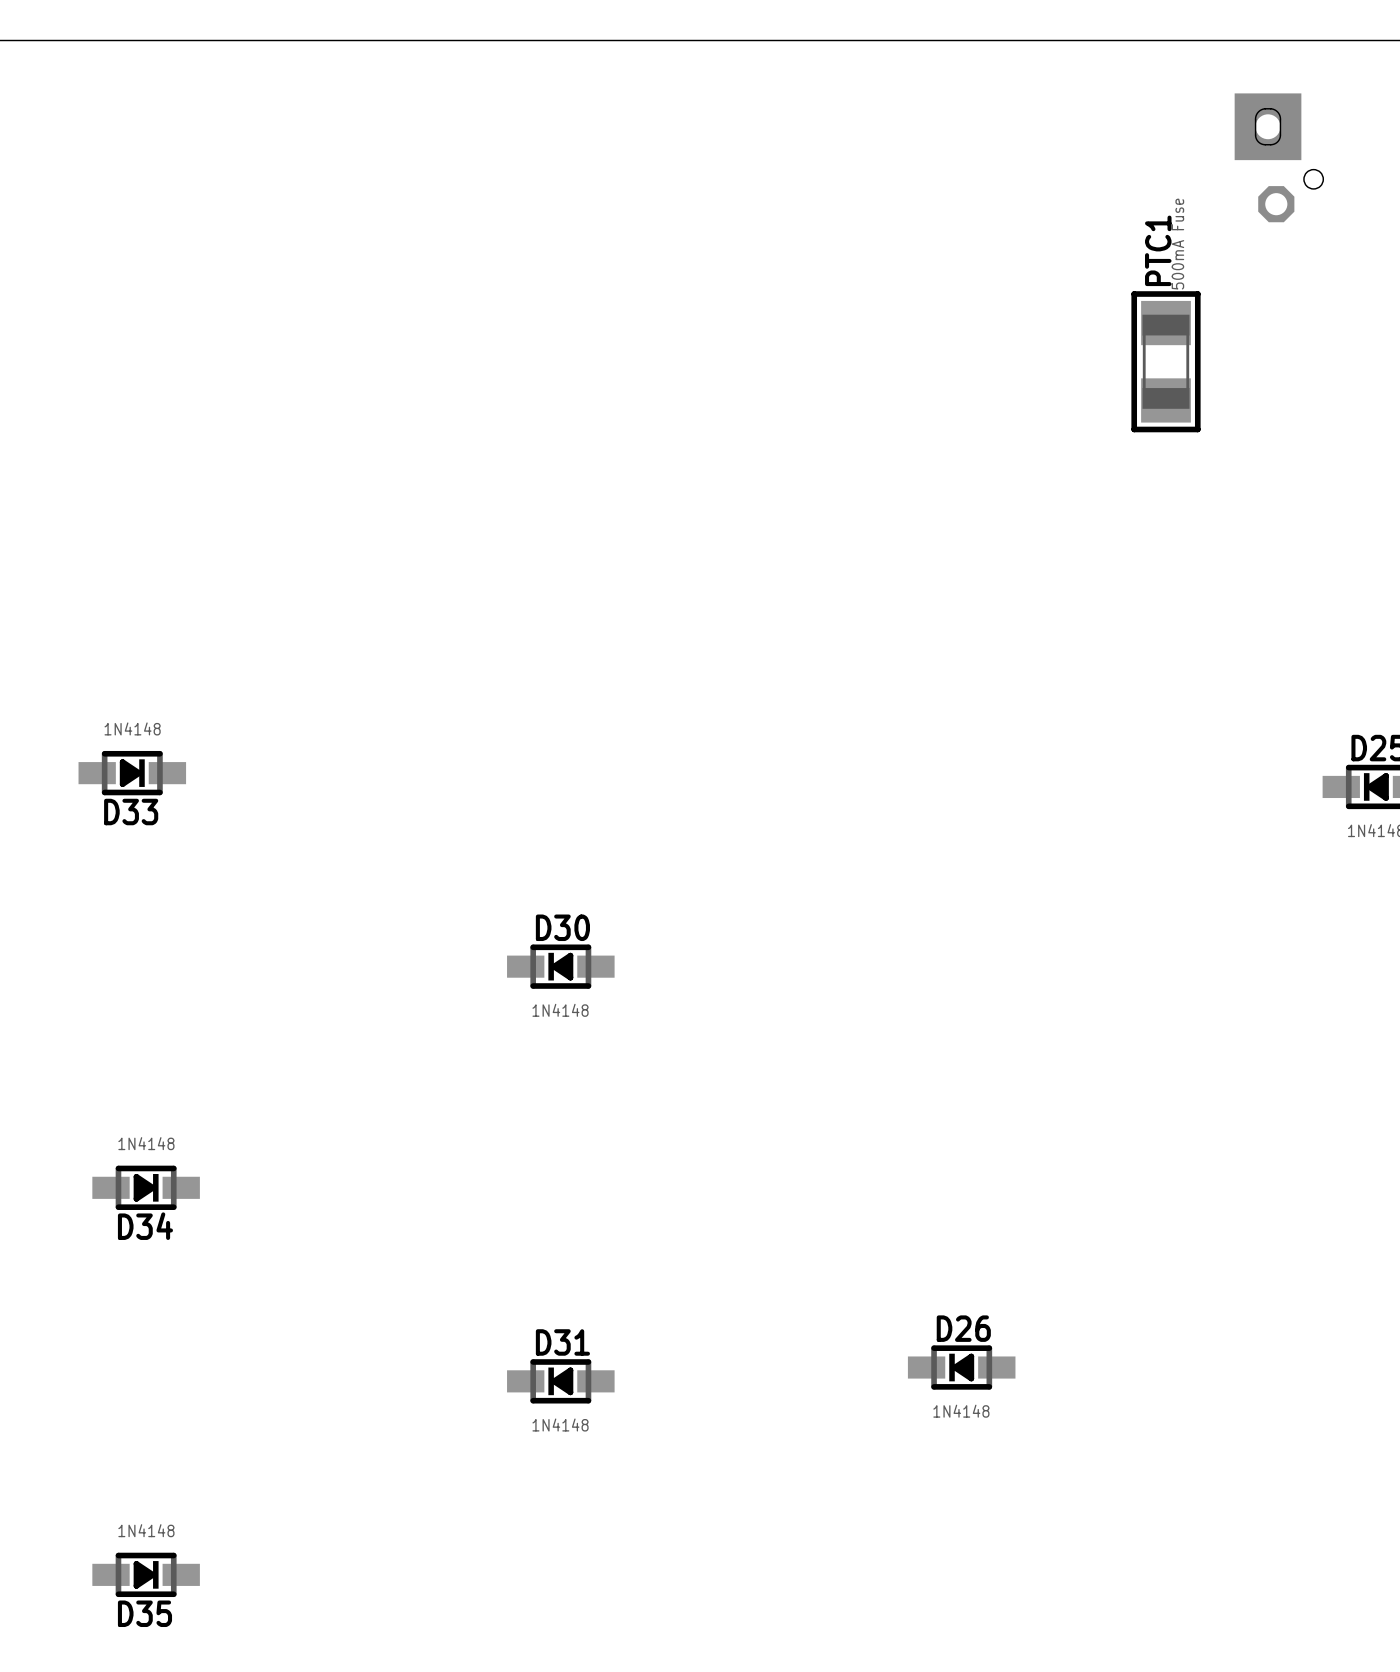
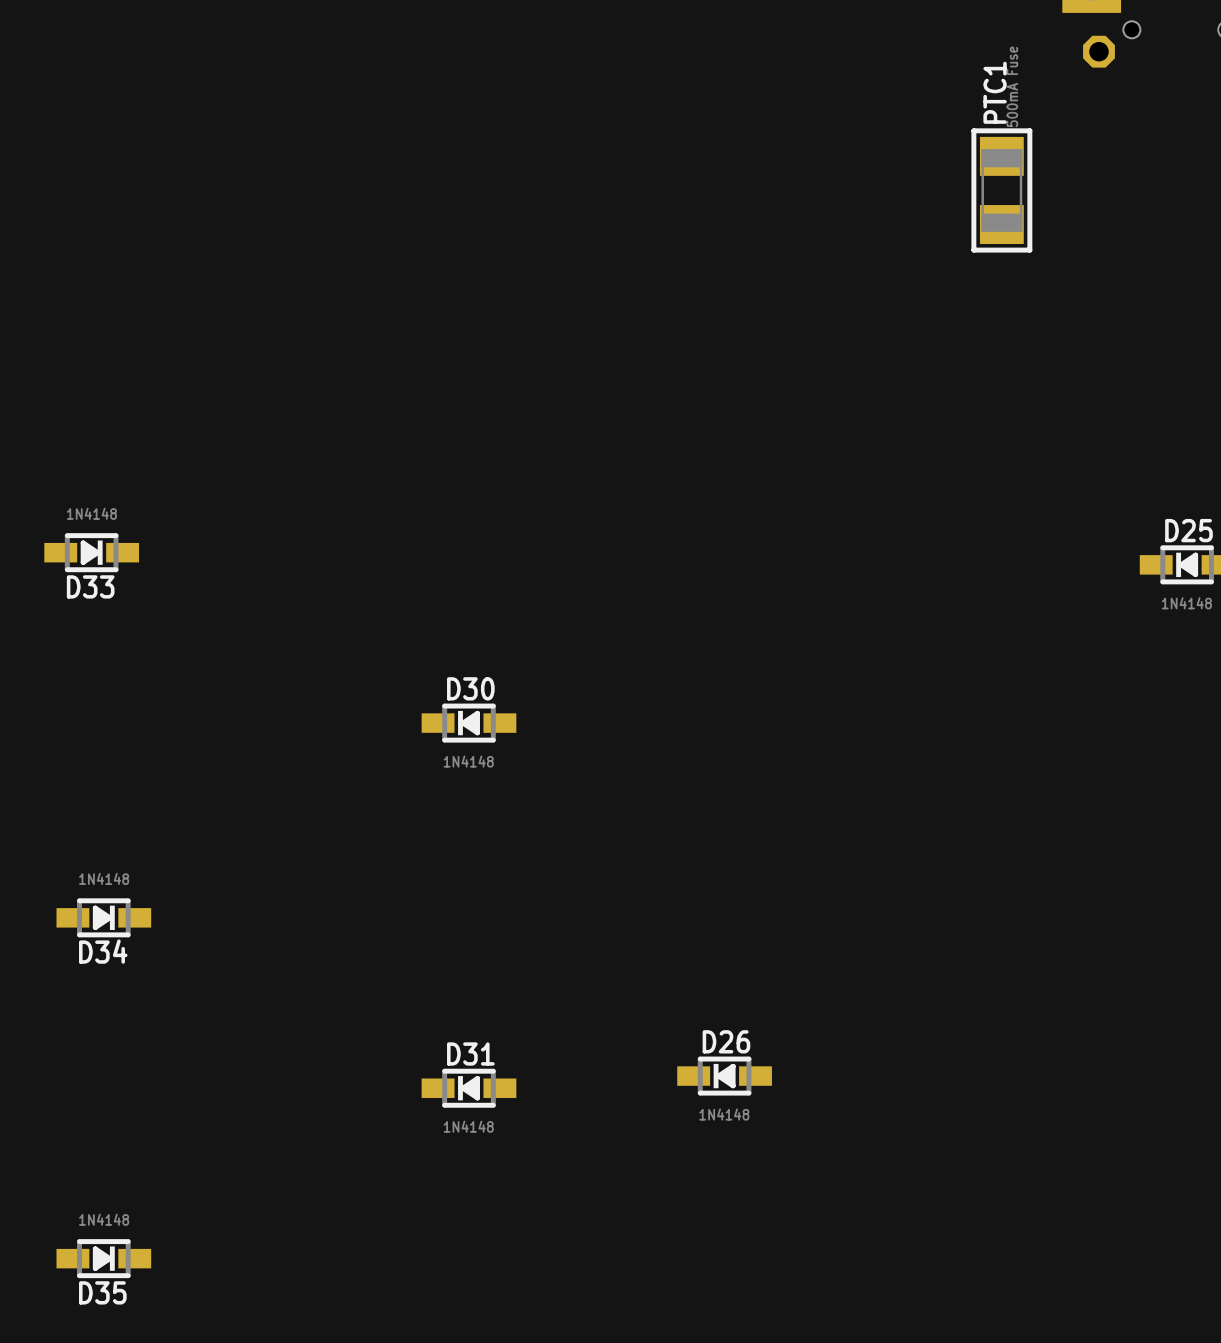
D26 position: (961, 1367) -> (724, 1076)

